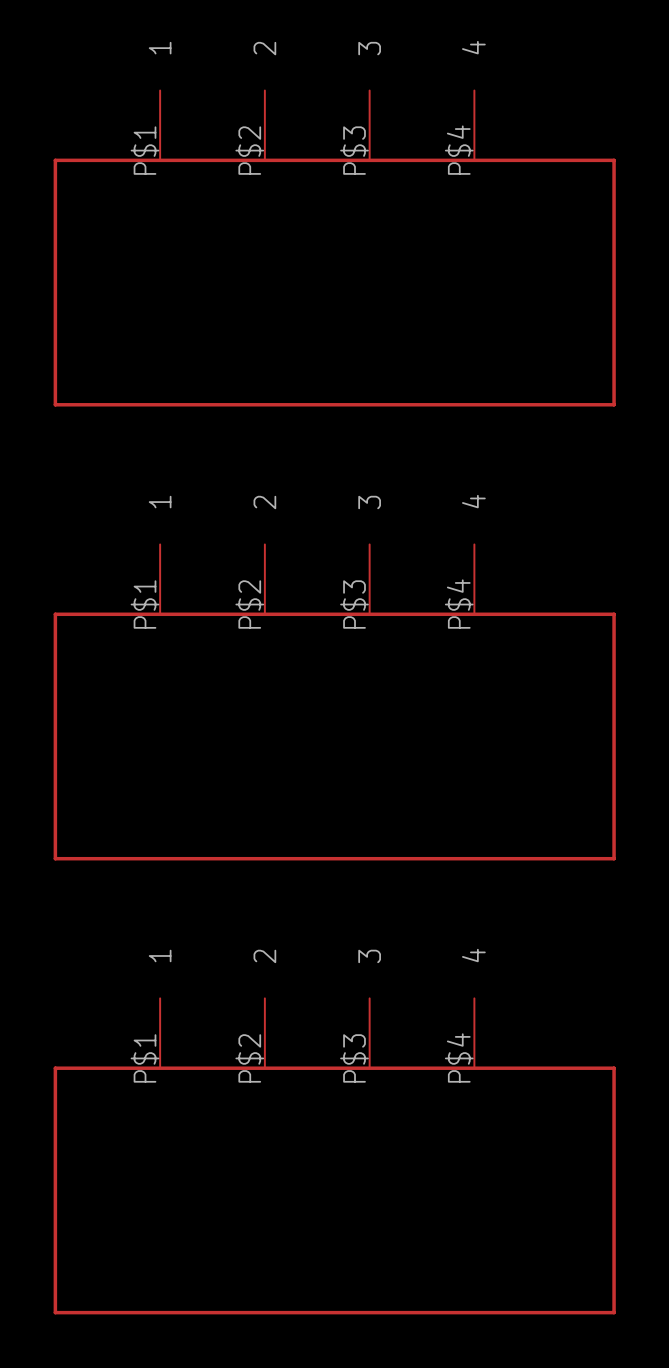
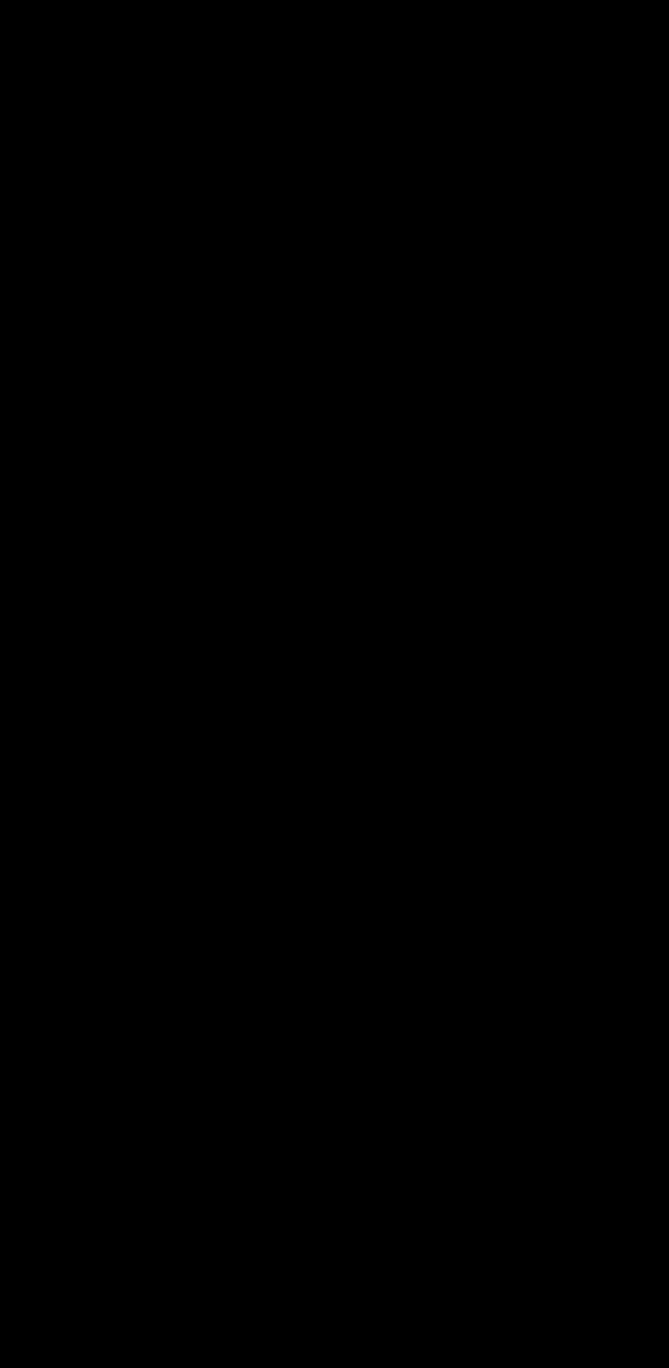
part: (334, 248) -> none
part: (334, 702) -> none
part: (334, 1156) -> none

